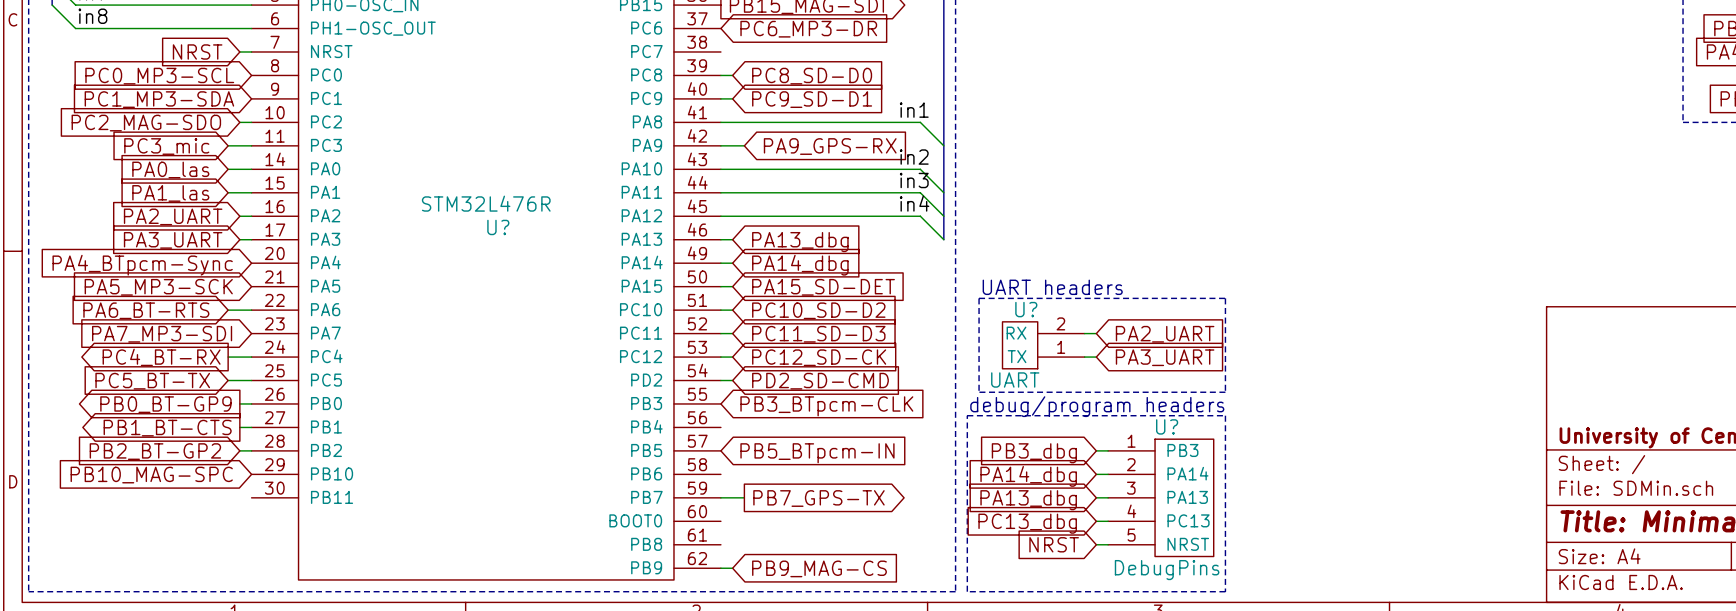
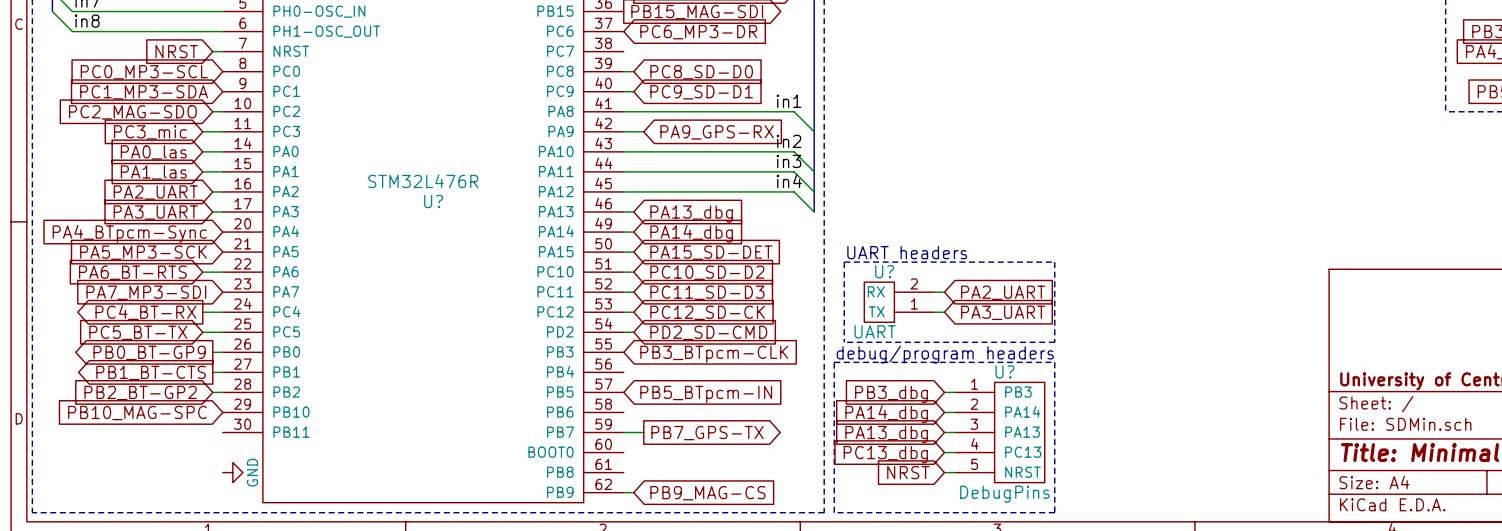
power symbol: none -> GND (232, 472)

